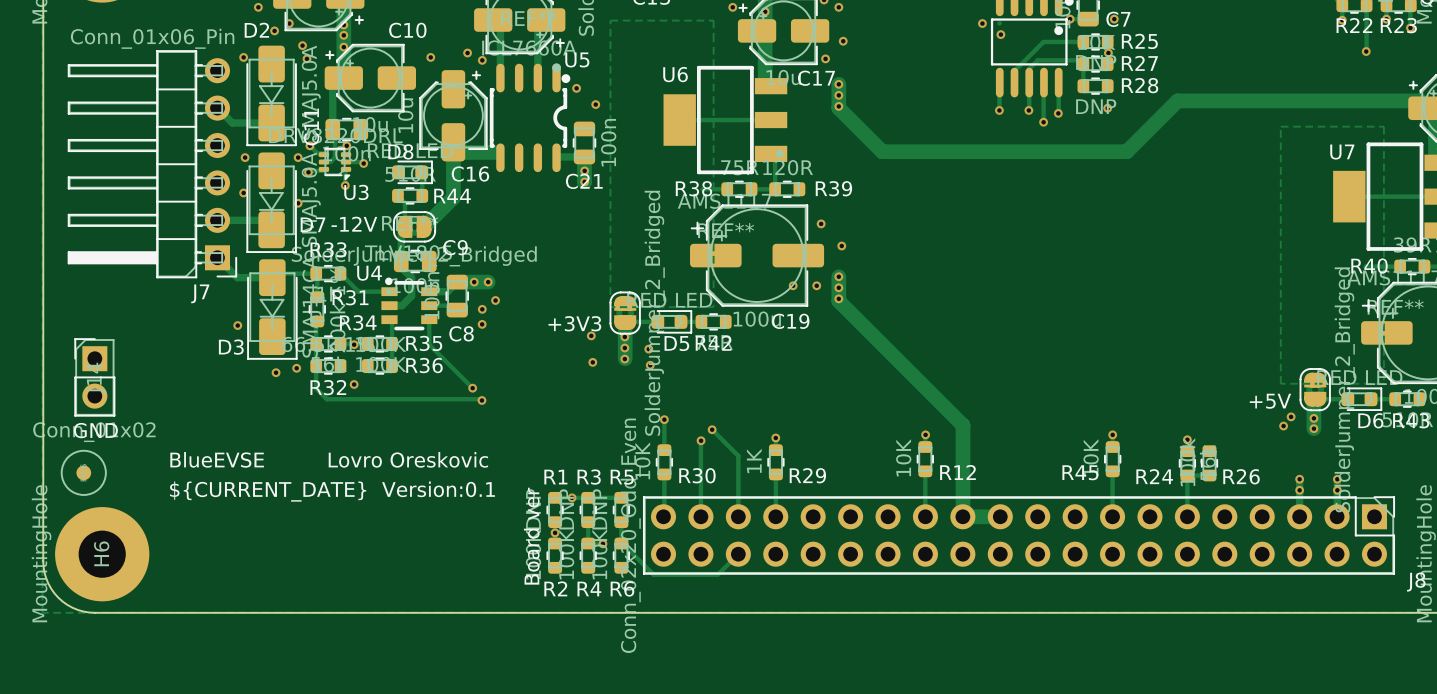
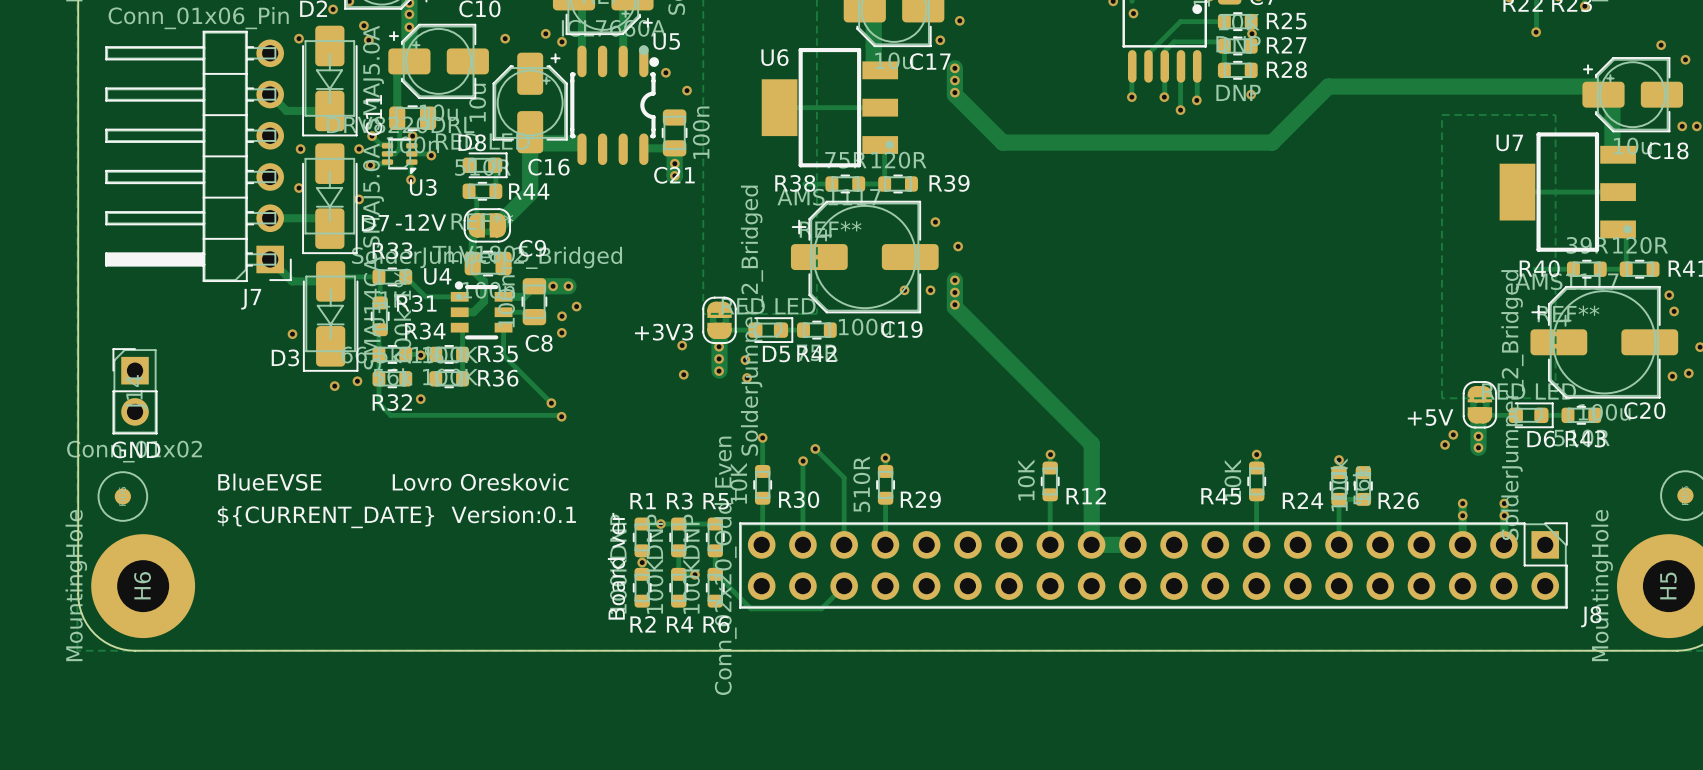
R29 value: 1K (754, 460) -> 510R (861, 484)

